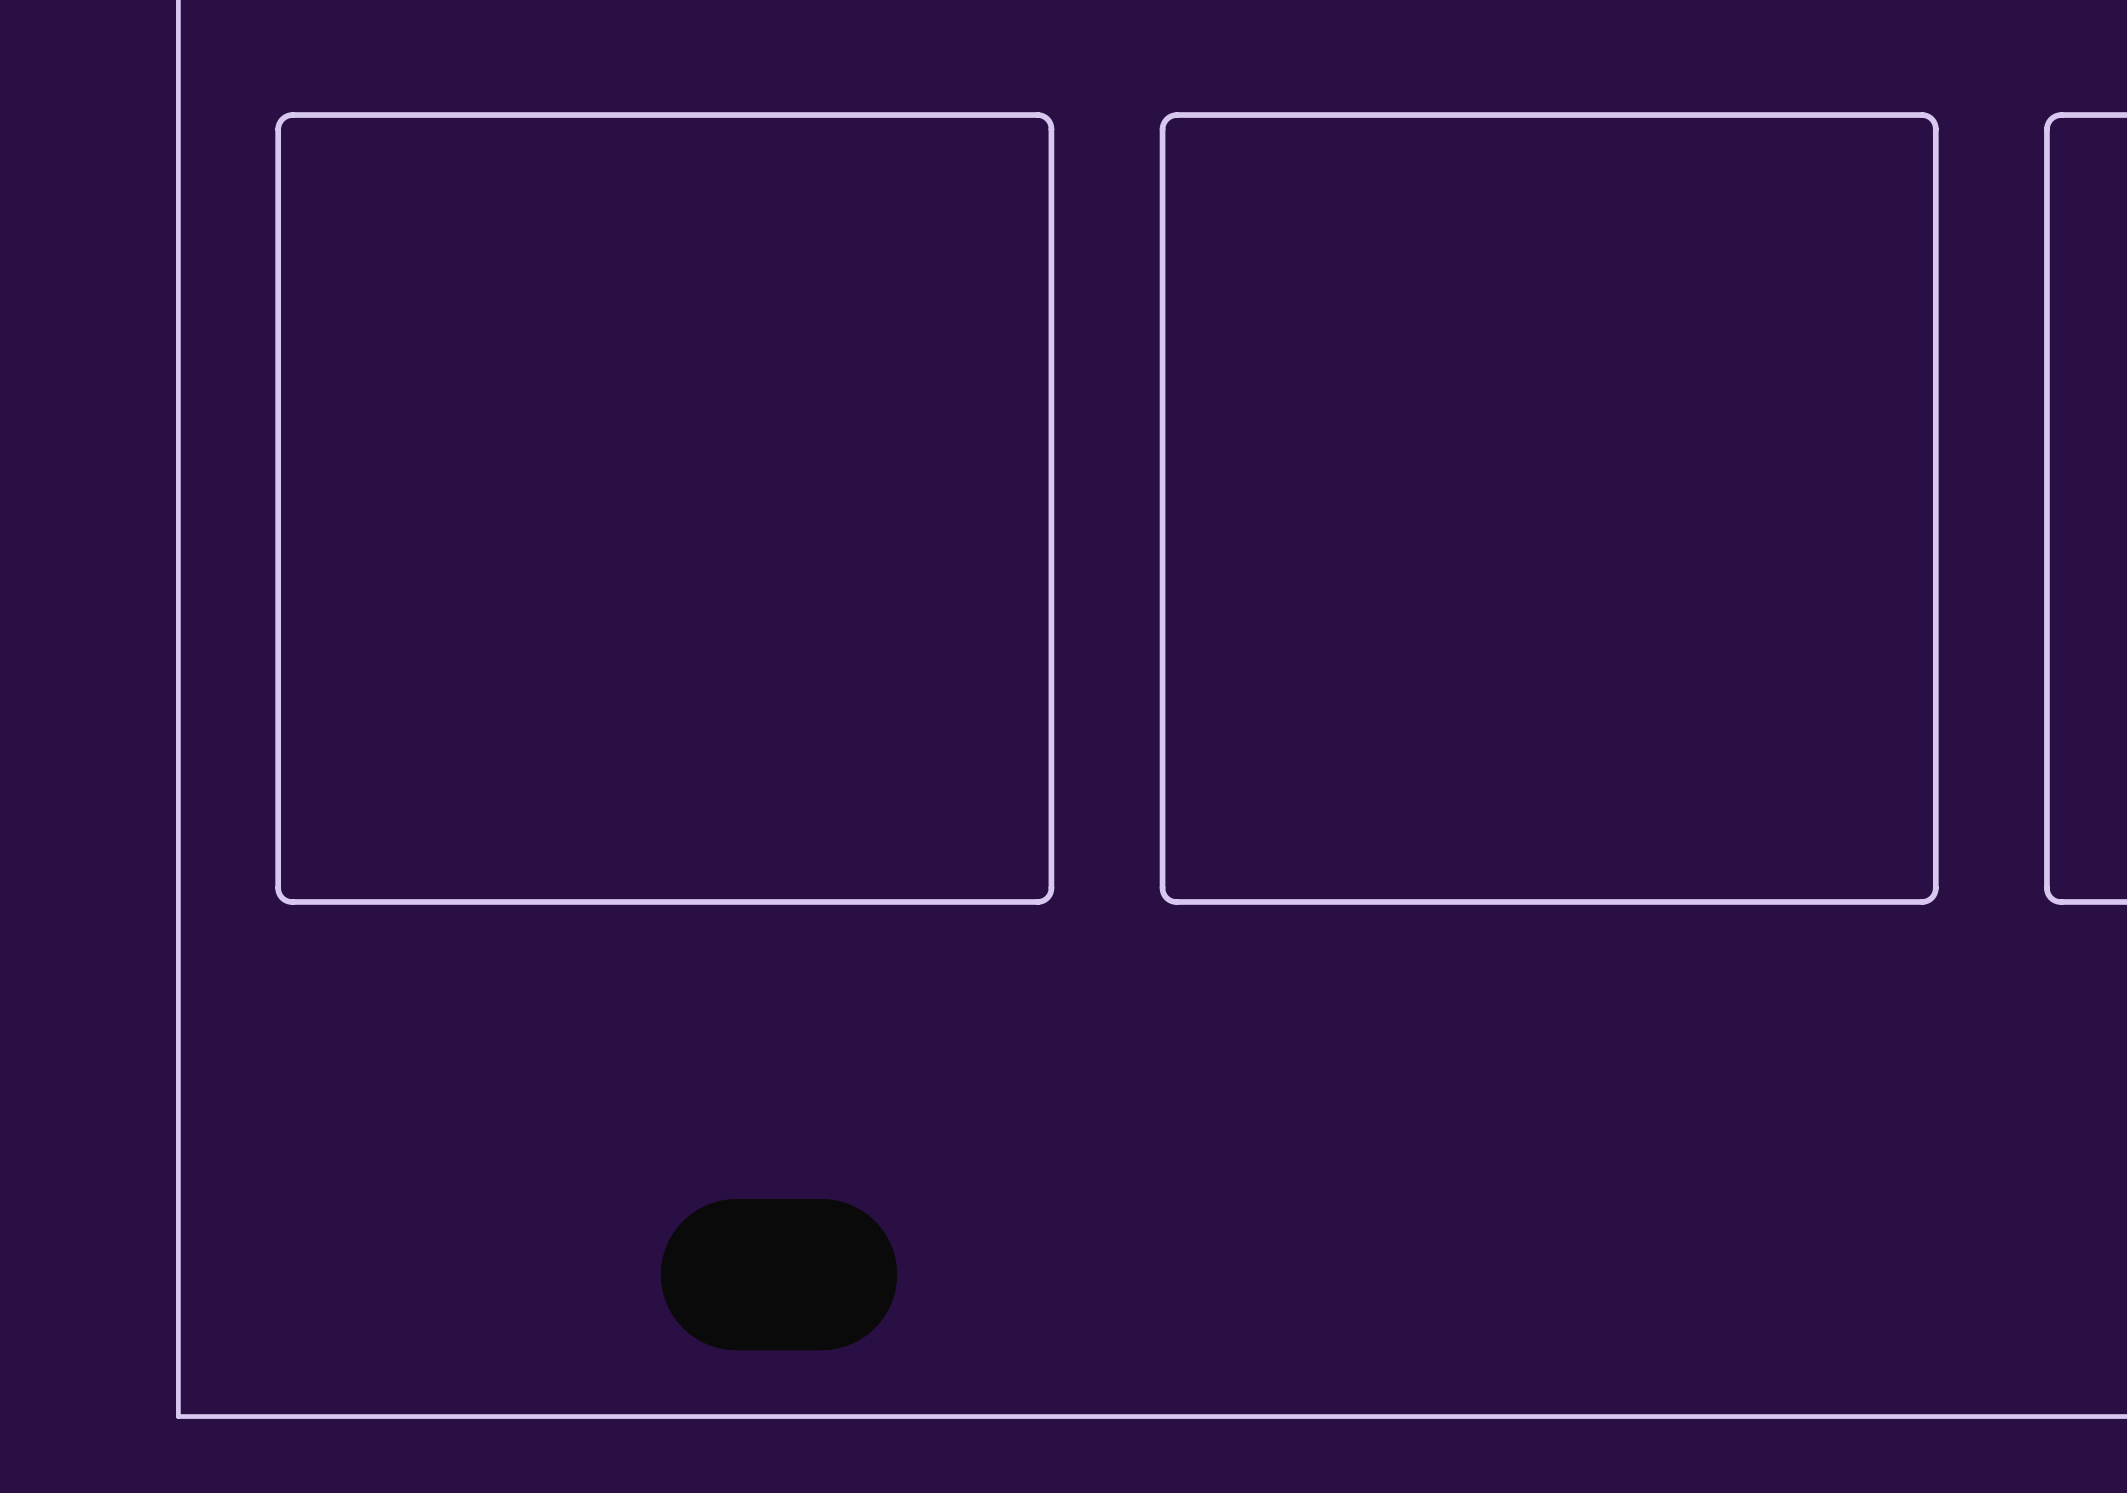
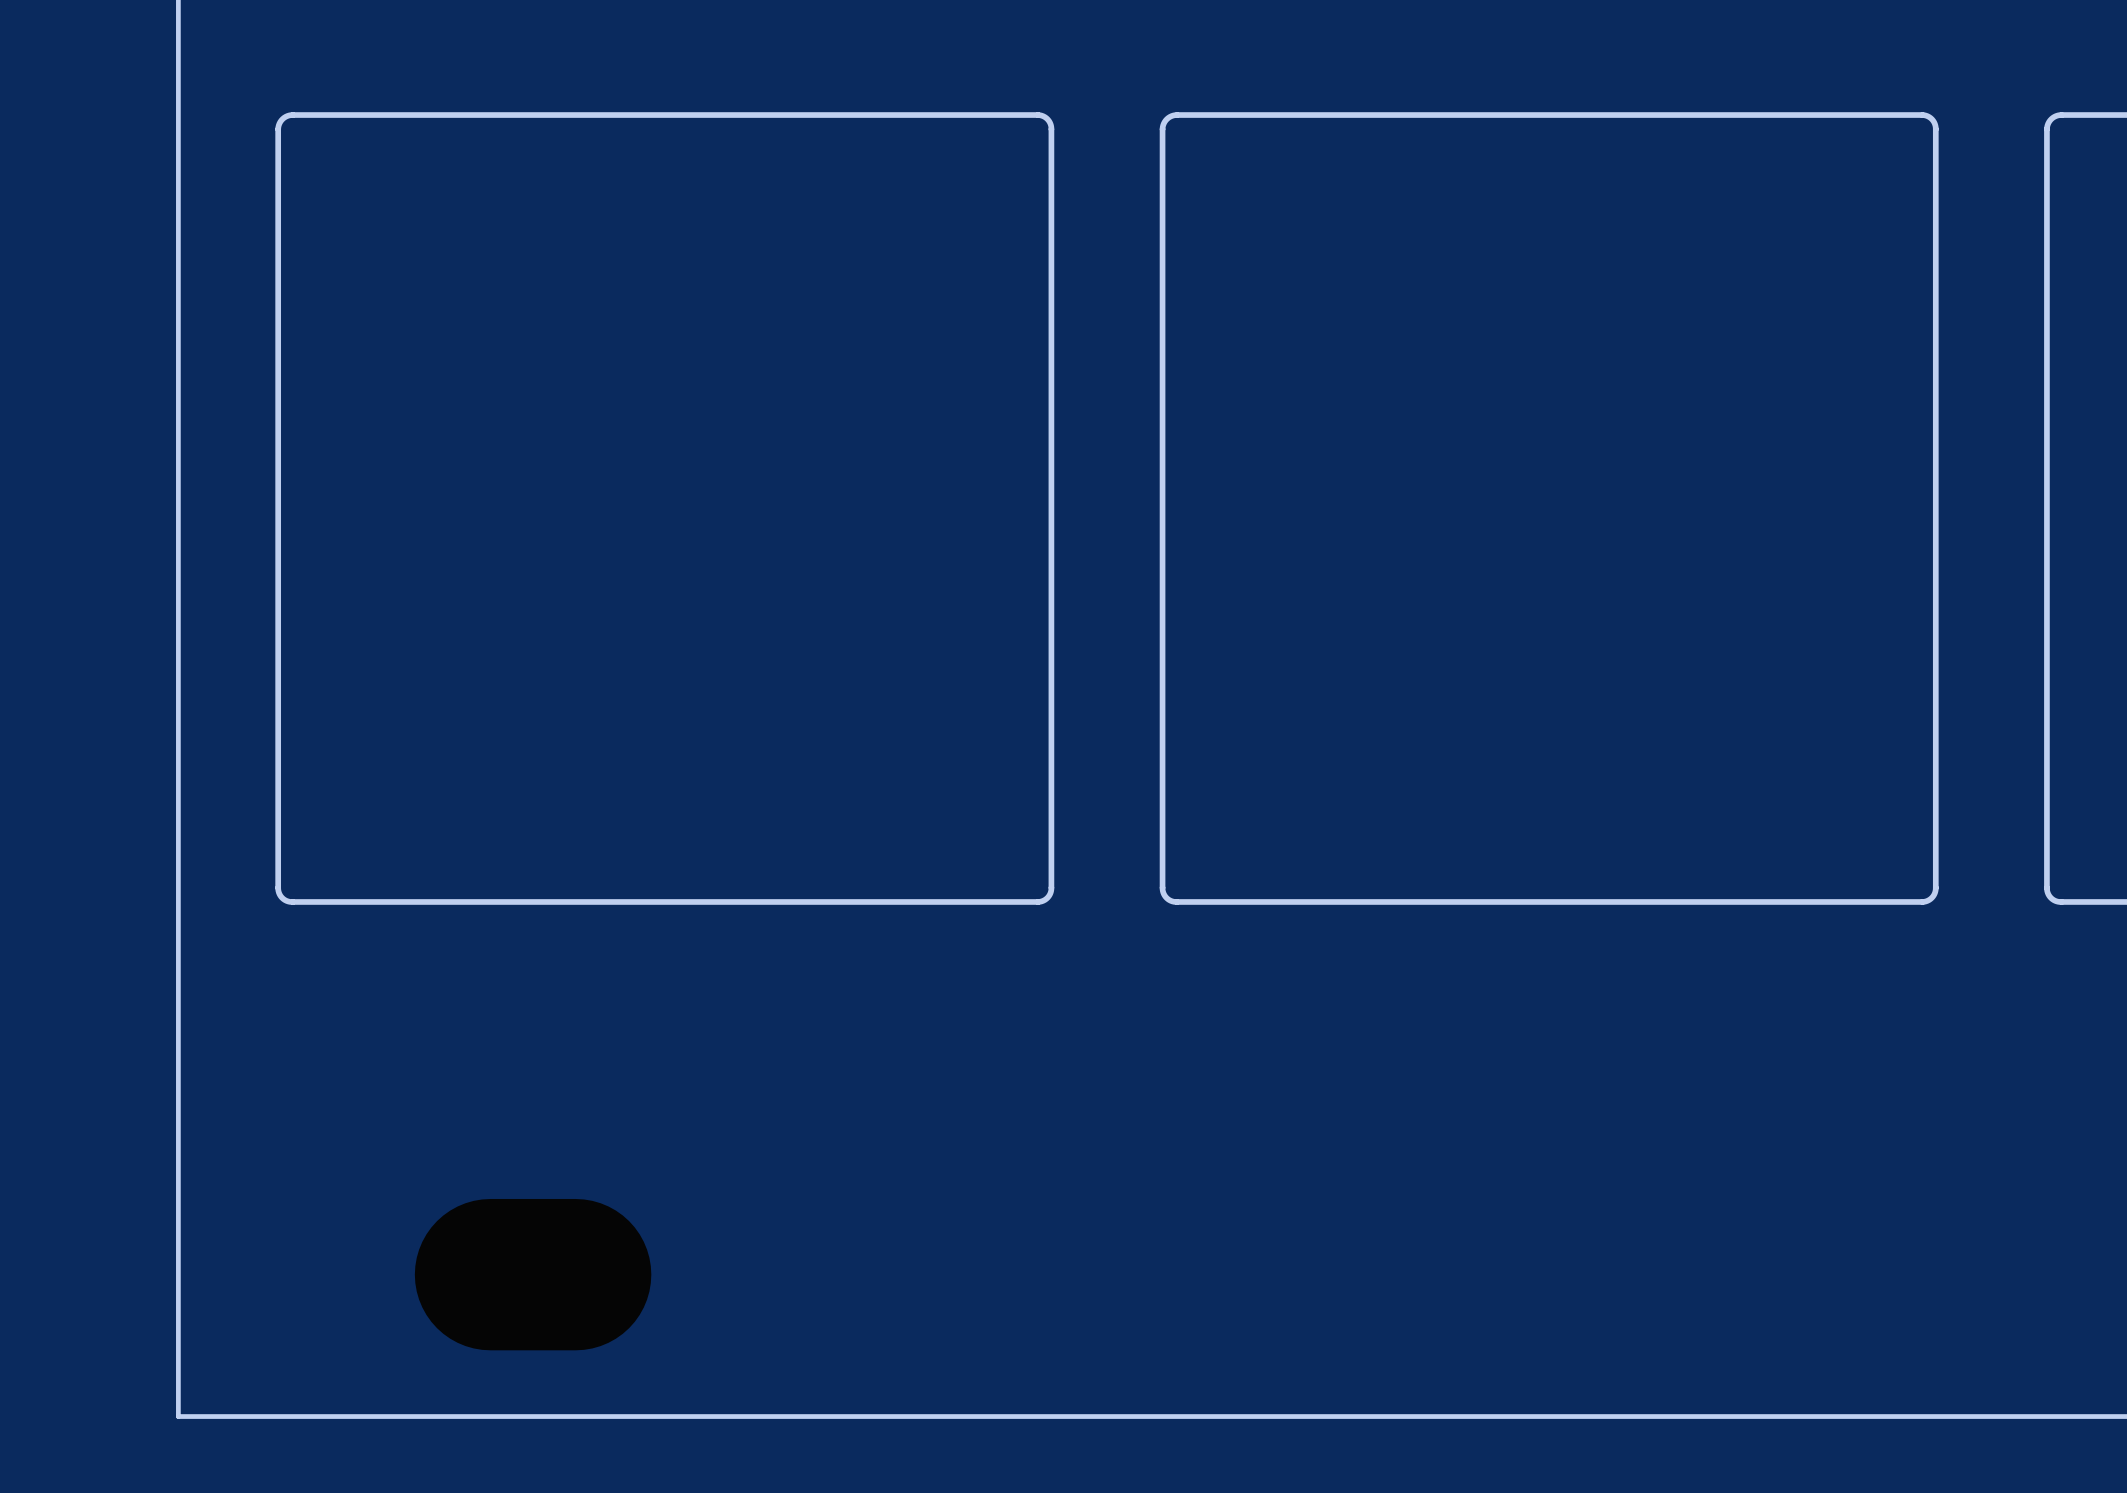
part position: (779, 1274) -> (533, 1274)

